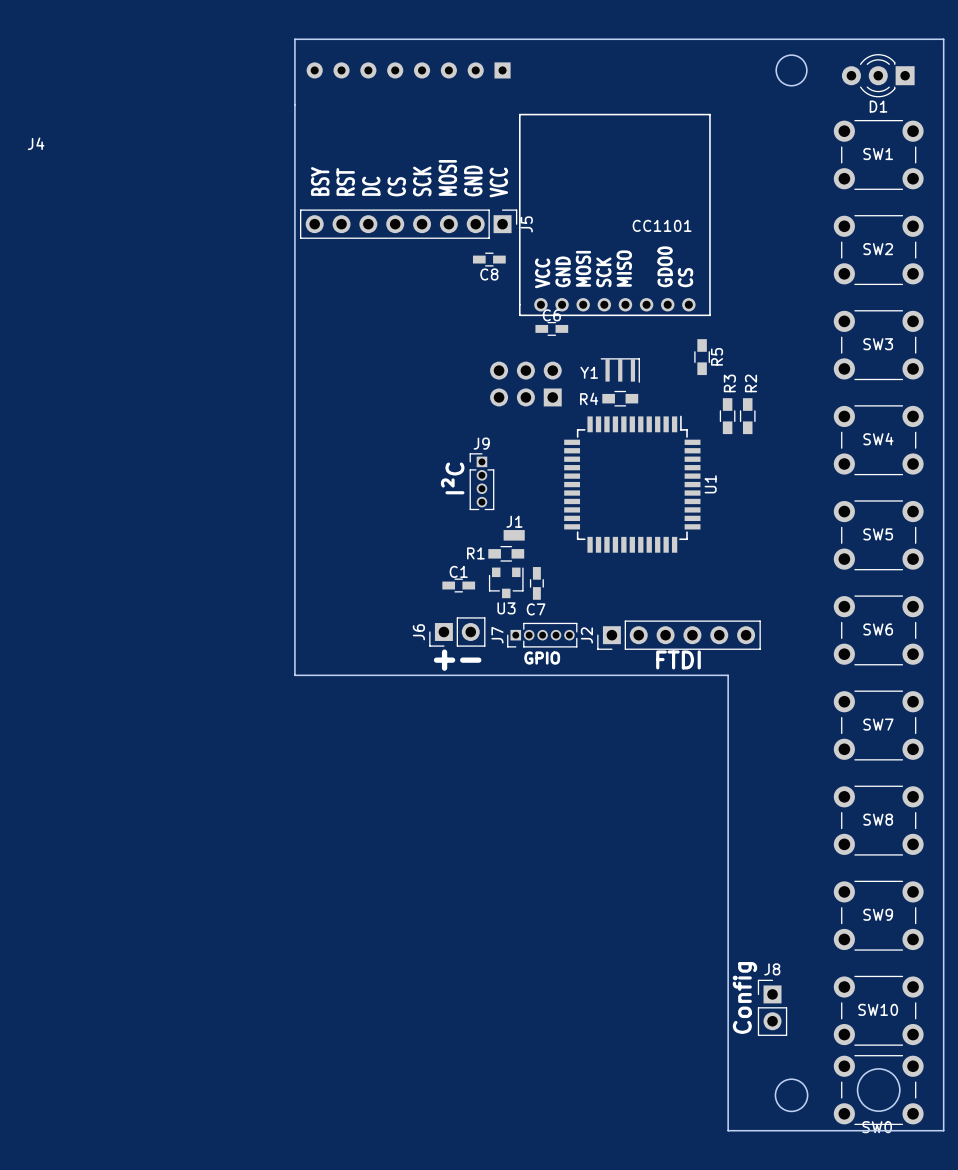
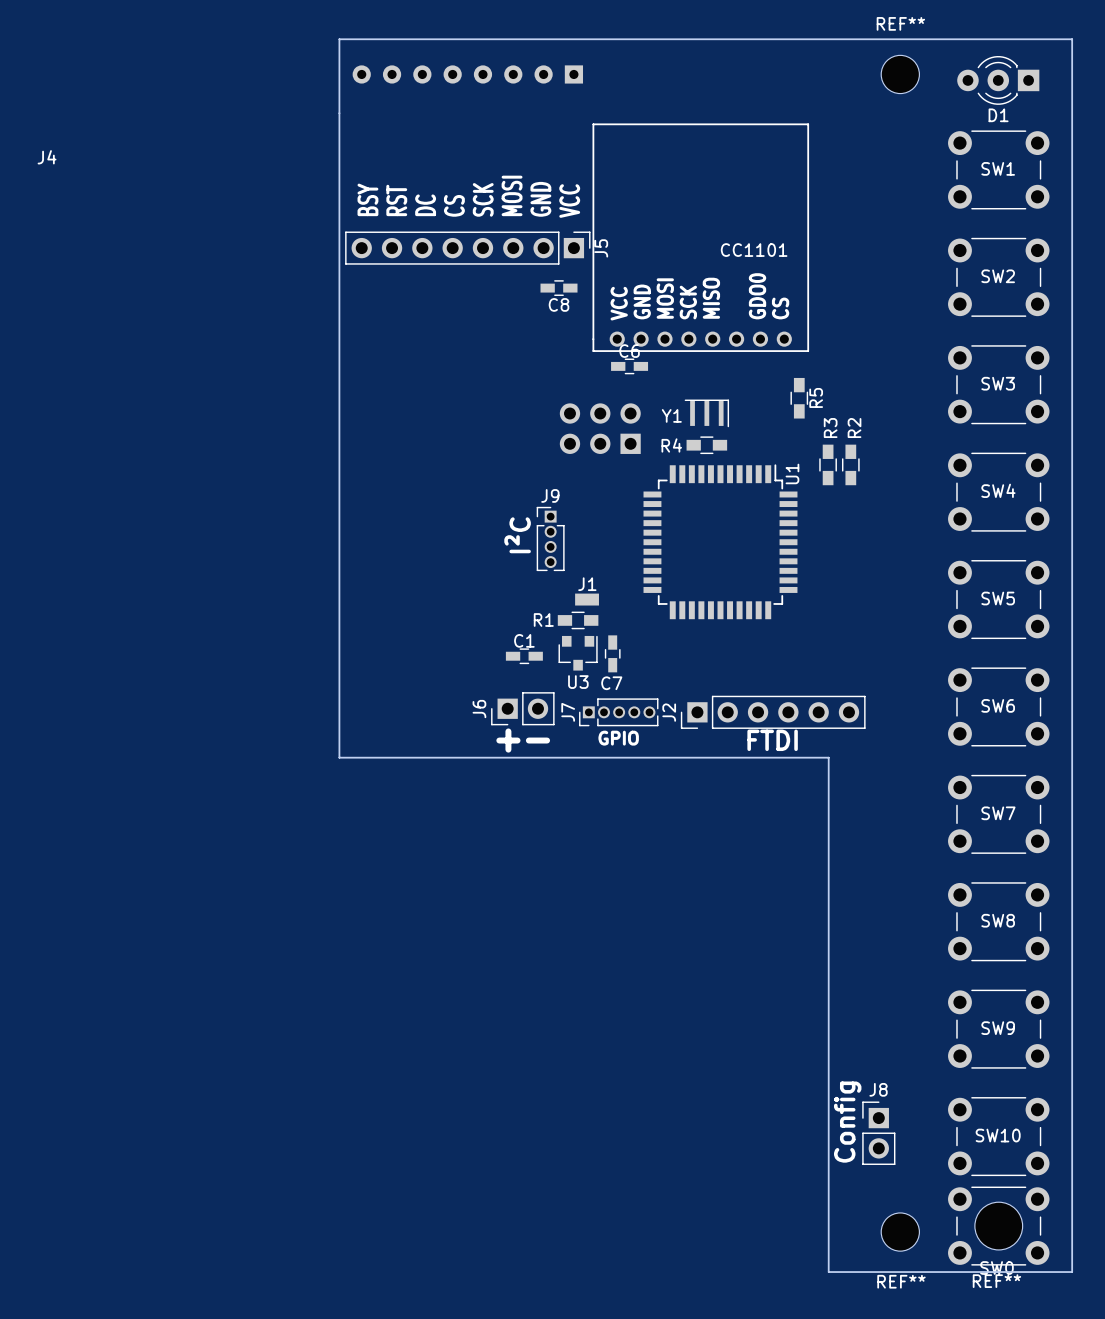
round board edge: [775, 54, 808, 87] -> none
REF**: none -> (900, 74)
U1 name position: U1 (710, 484) -> U1 (792, 473)
round board edge: [856, 1068, 901, 1112] -> none
round board edge: [774, 1078, 809, 1113] -> none
REF**: none -> (998, 1226)
REF**: none -> (900, 1232)

